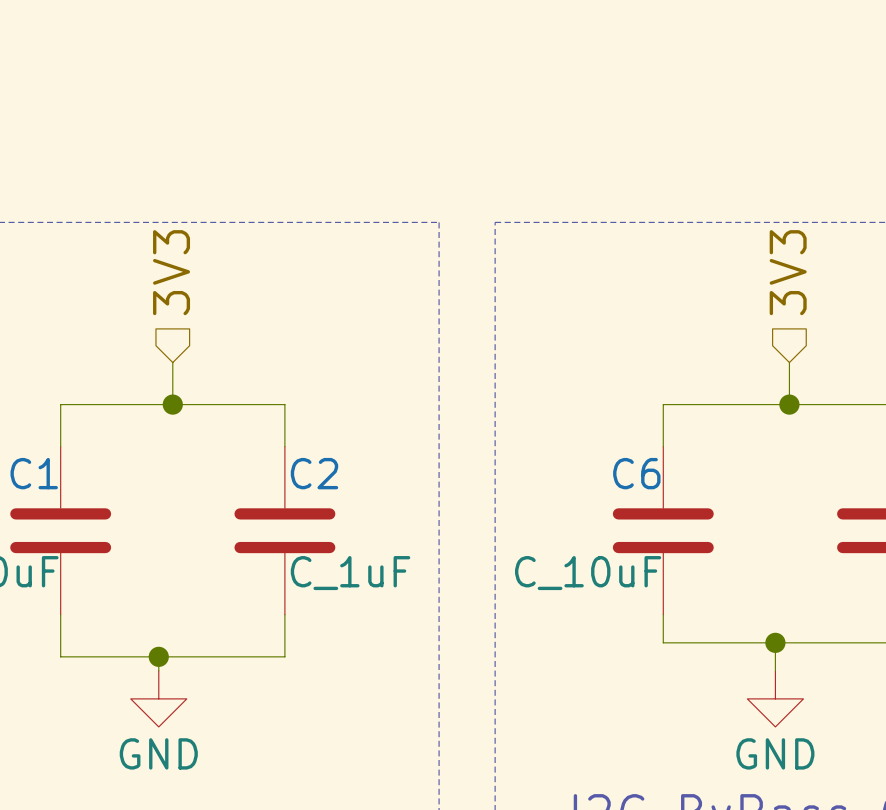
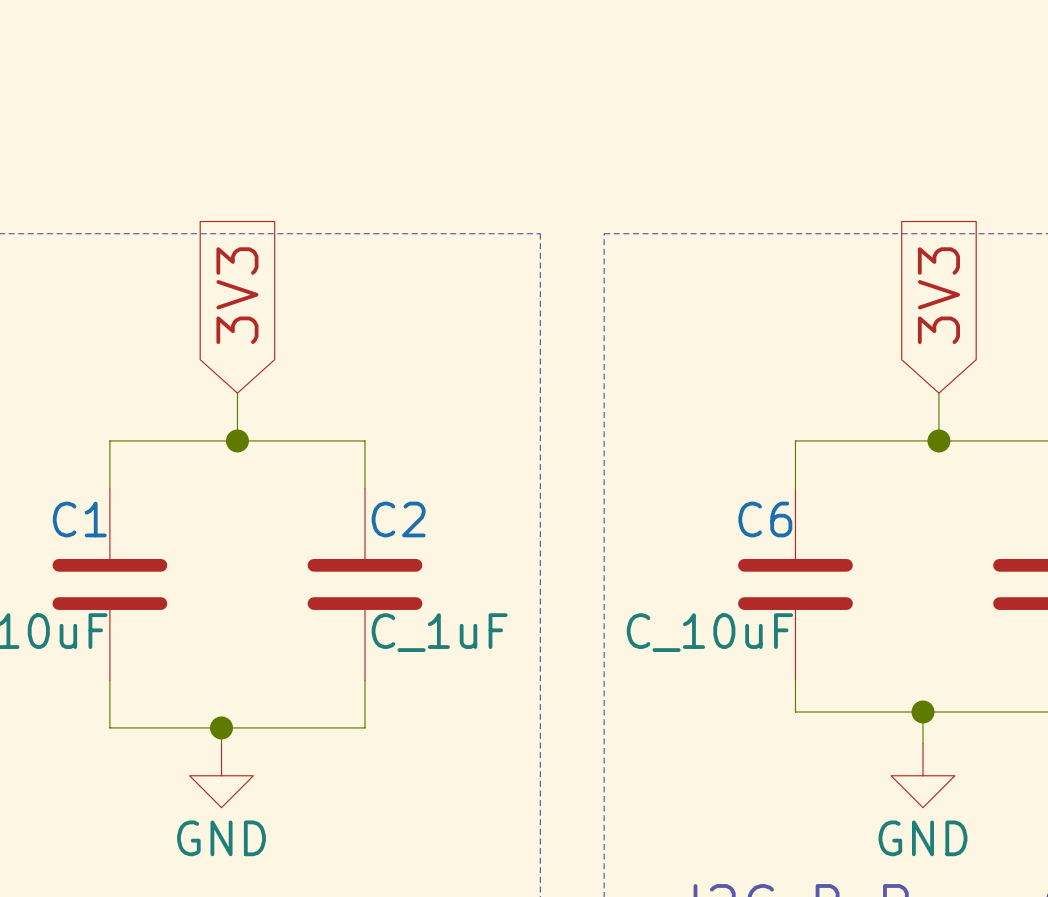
hierarchical label: 3V3 (171, 272) -> none
hierarchical label: 3V3 (788, 272) -> none
global label: none -> 3V3 (237, 295)
global label: none -> 3V3 (938, 295)

